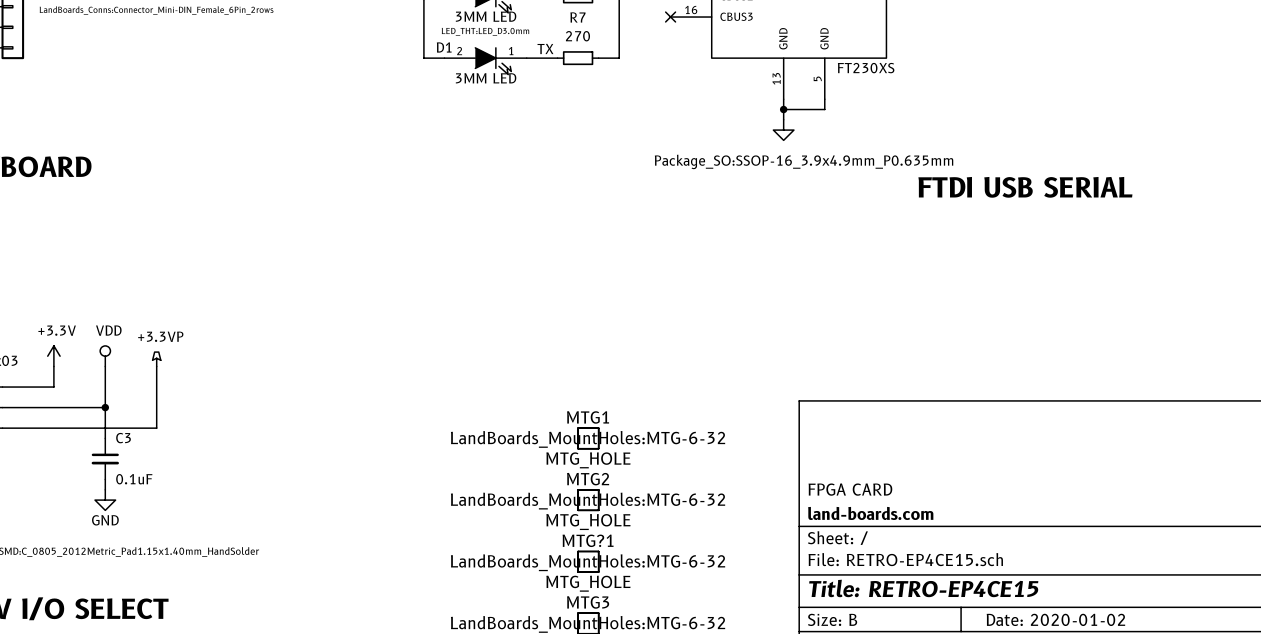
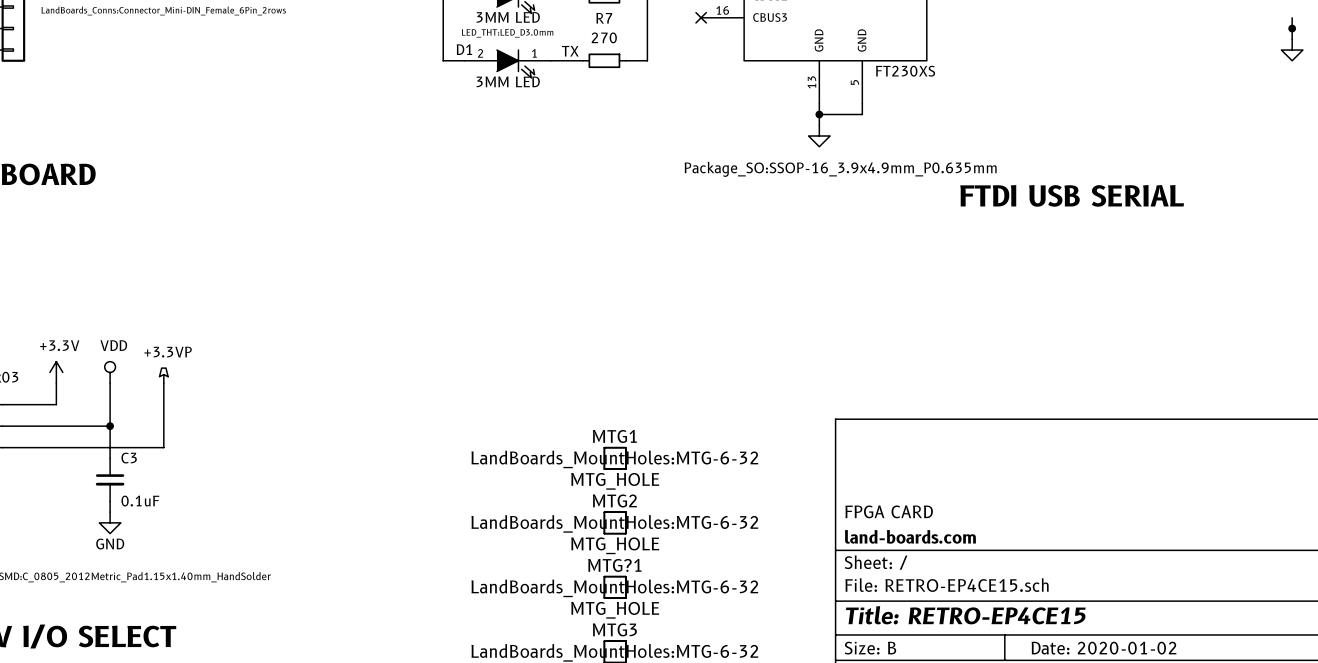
wire: none -> (1292, 17) (1292, 39)
junction: none -> (1292, 28)
power symbol: none -> (1292, 50)

